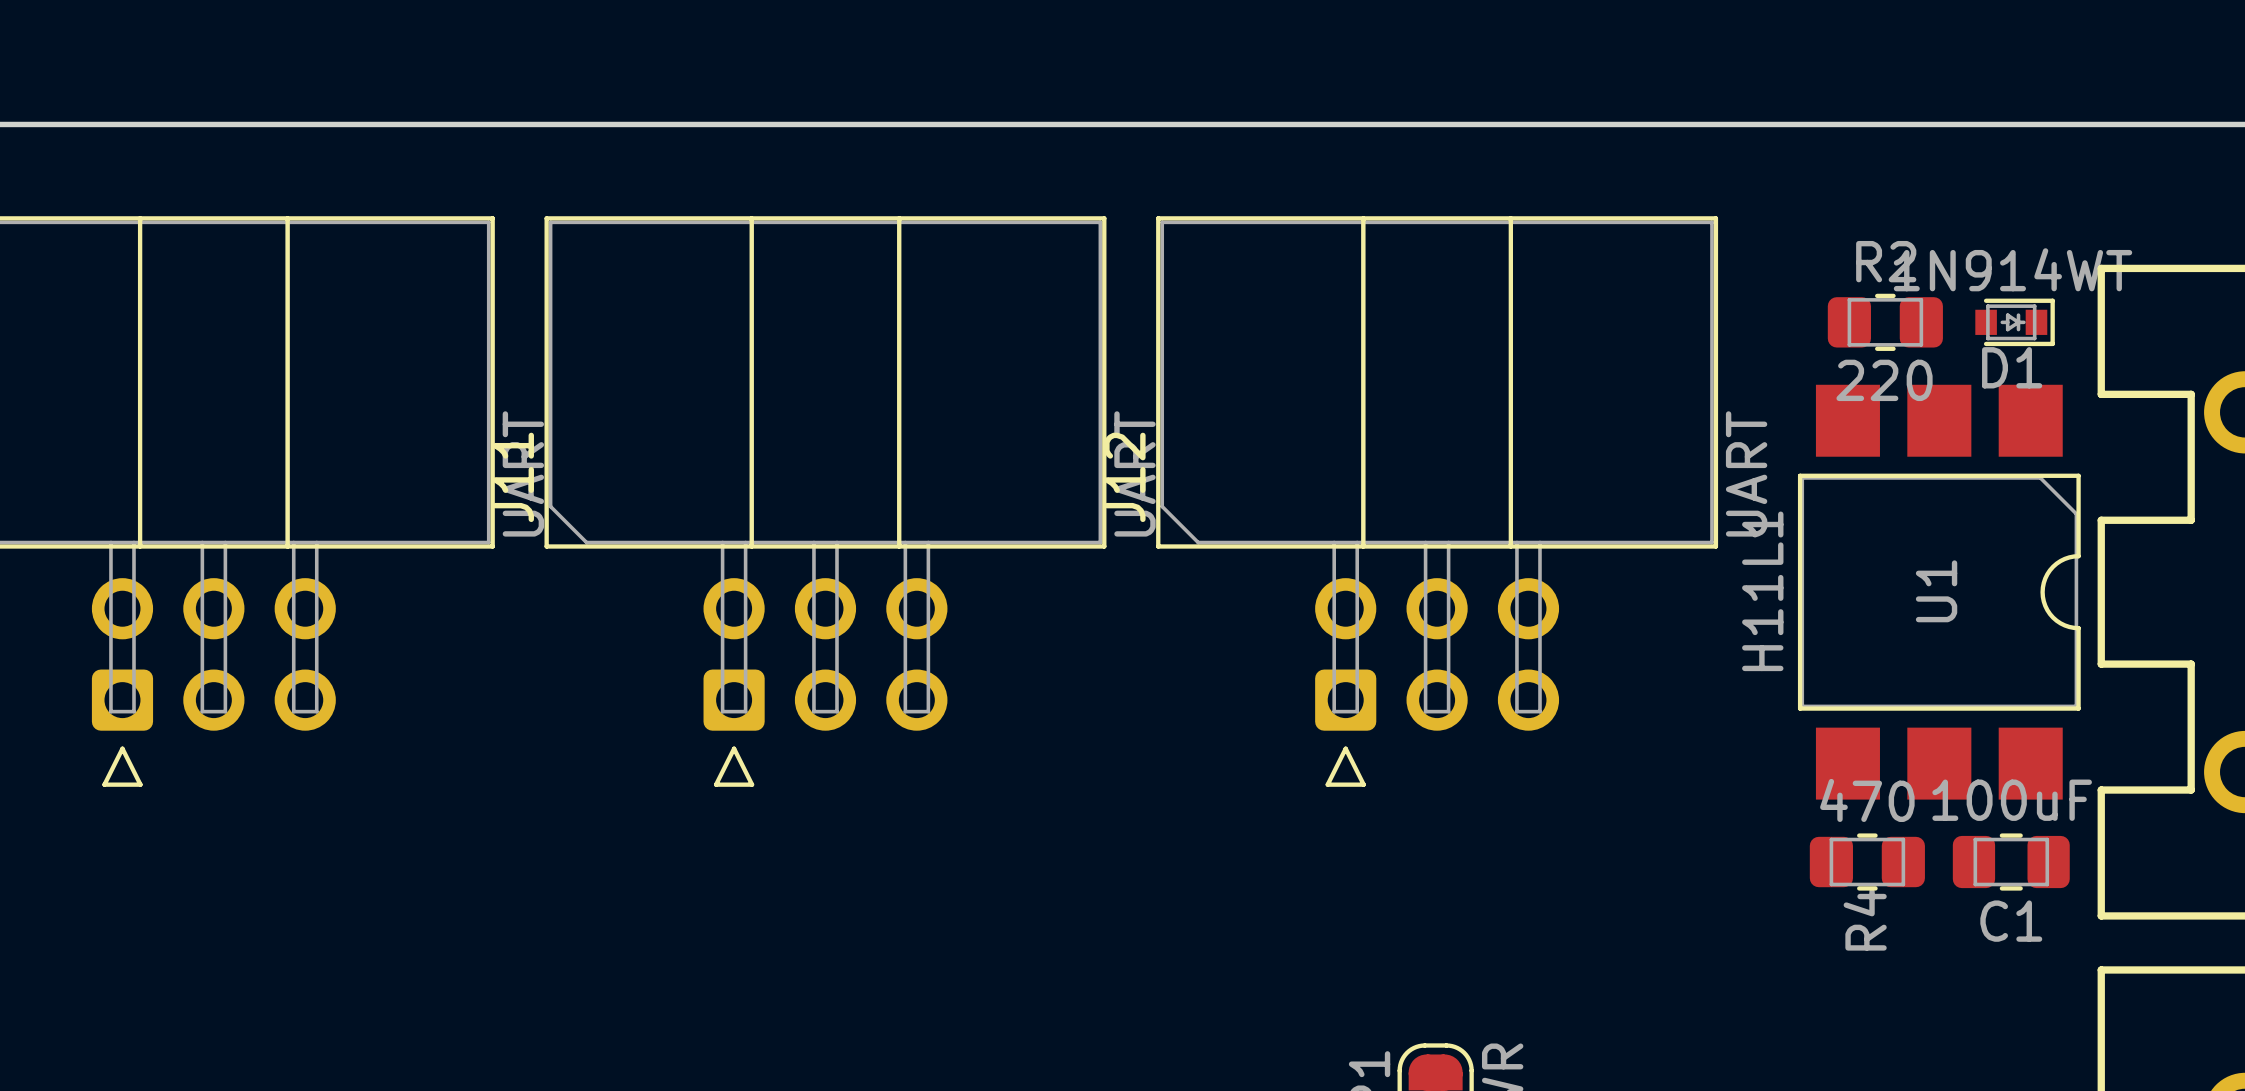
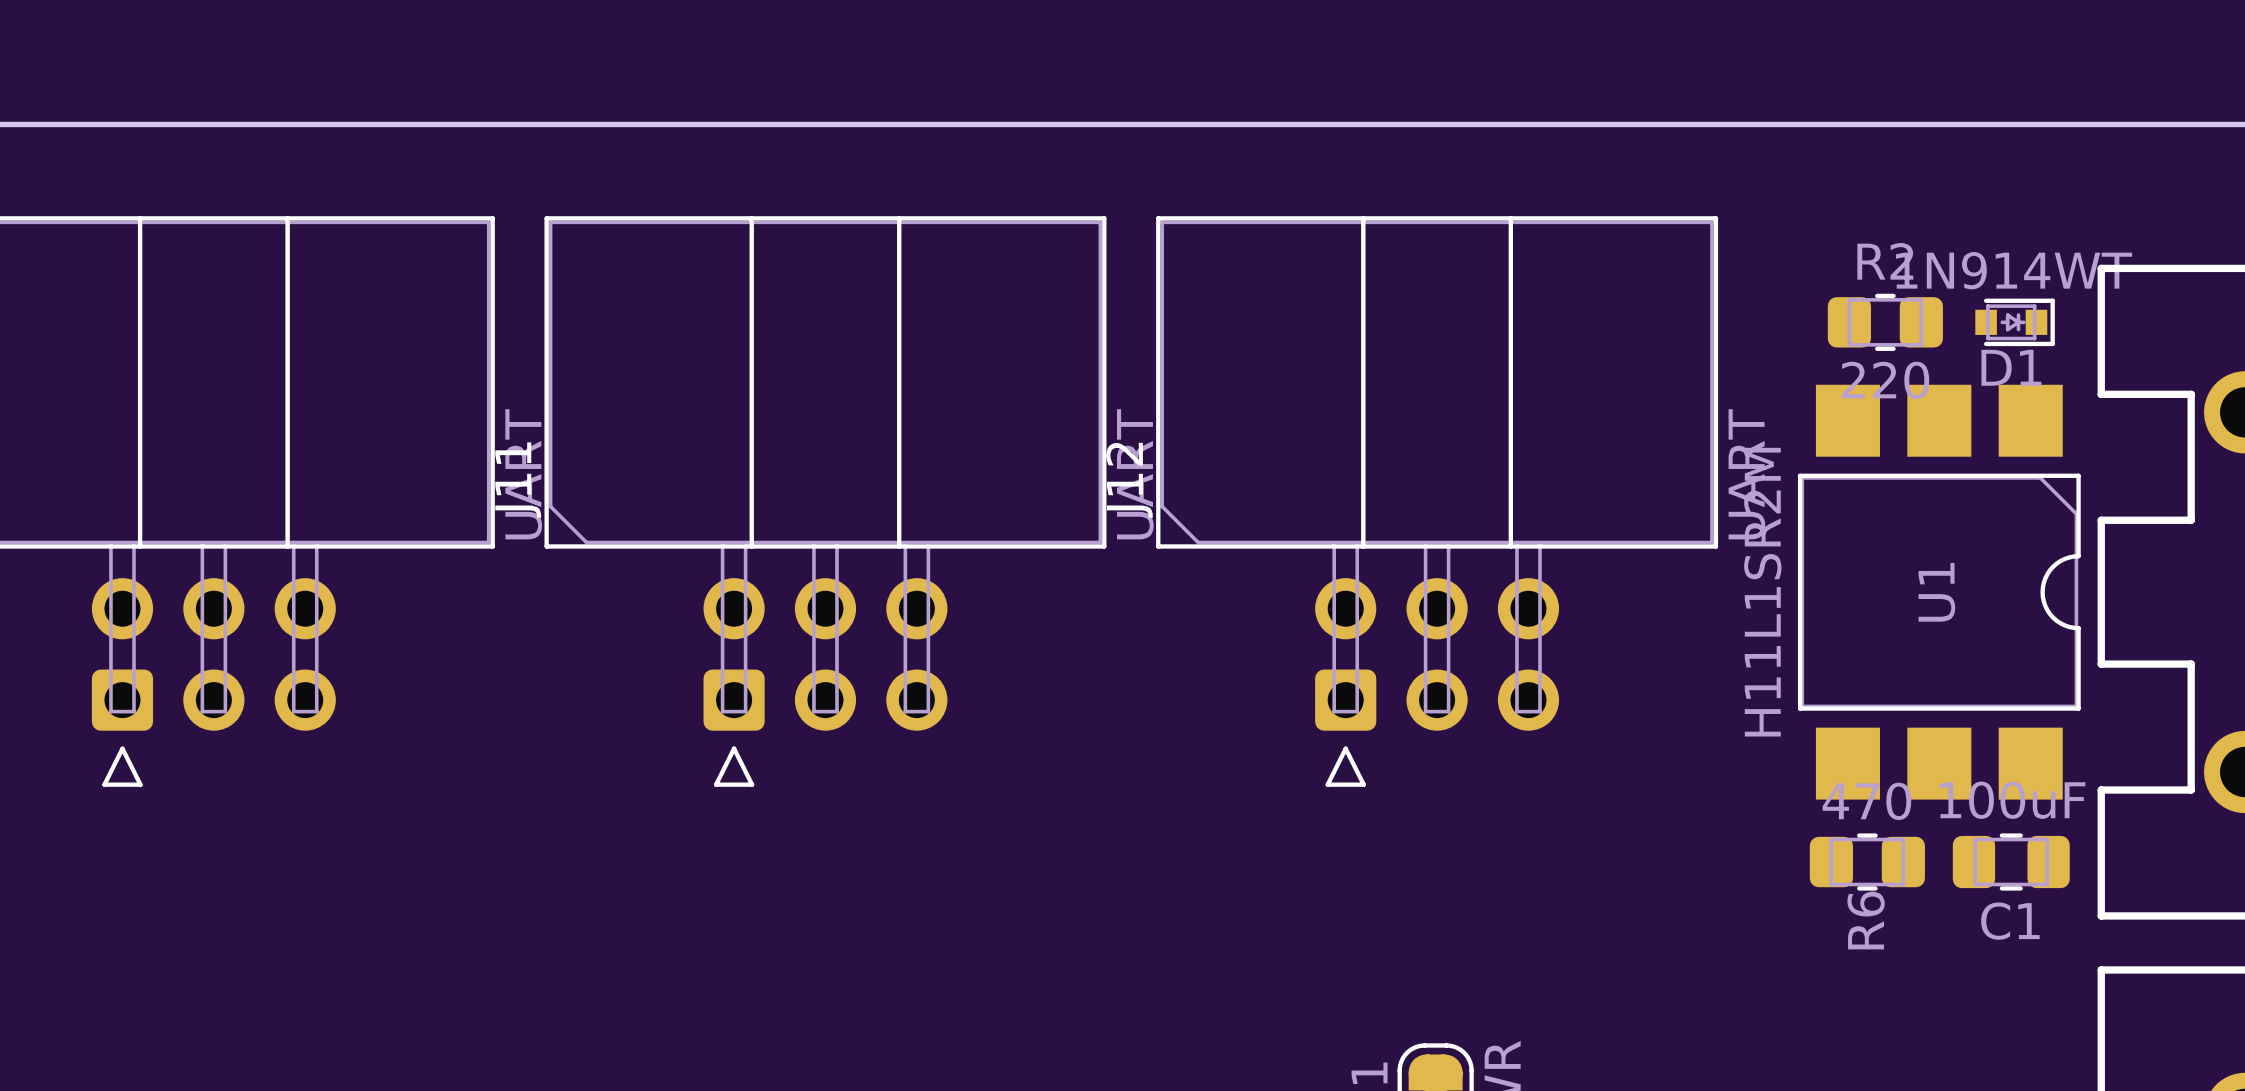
U1 value: H11L1 (1762, 591) -> H11L1SR2M (1762, 592)
R4 name: R4 (1865, 919) -> R6 (1866, 920)

